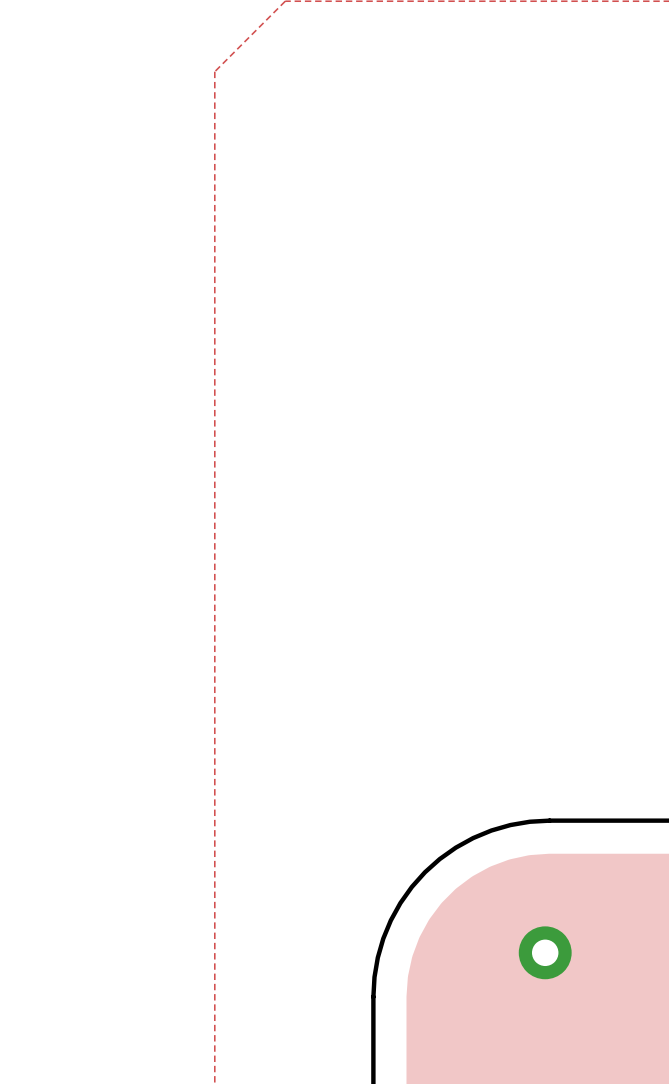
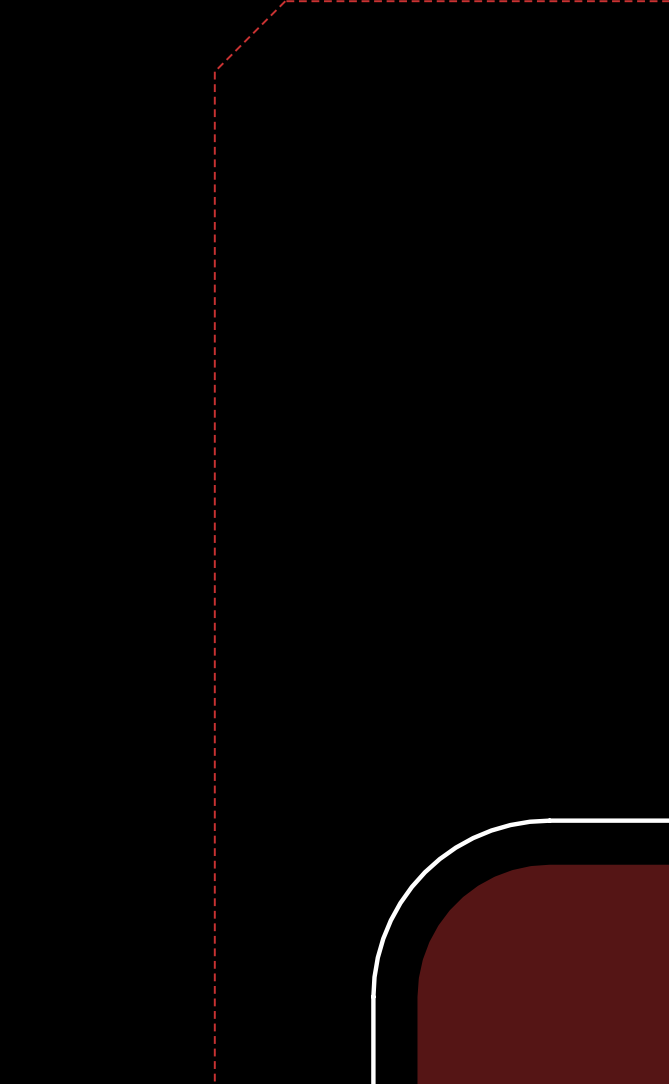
via: (545, 952) -> none

